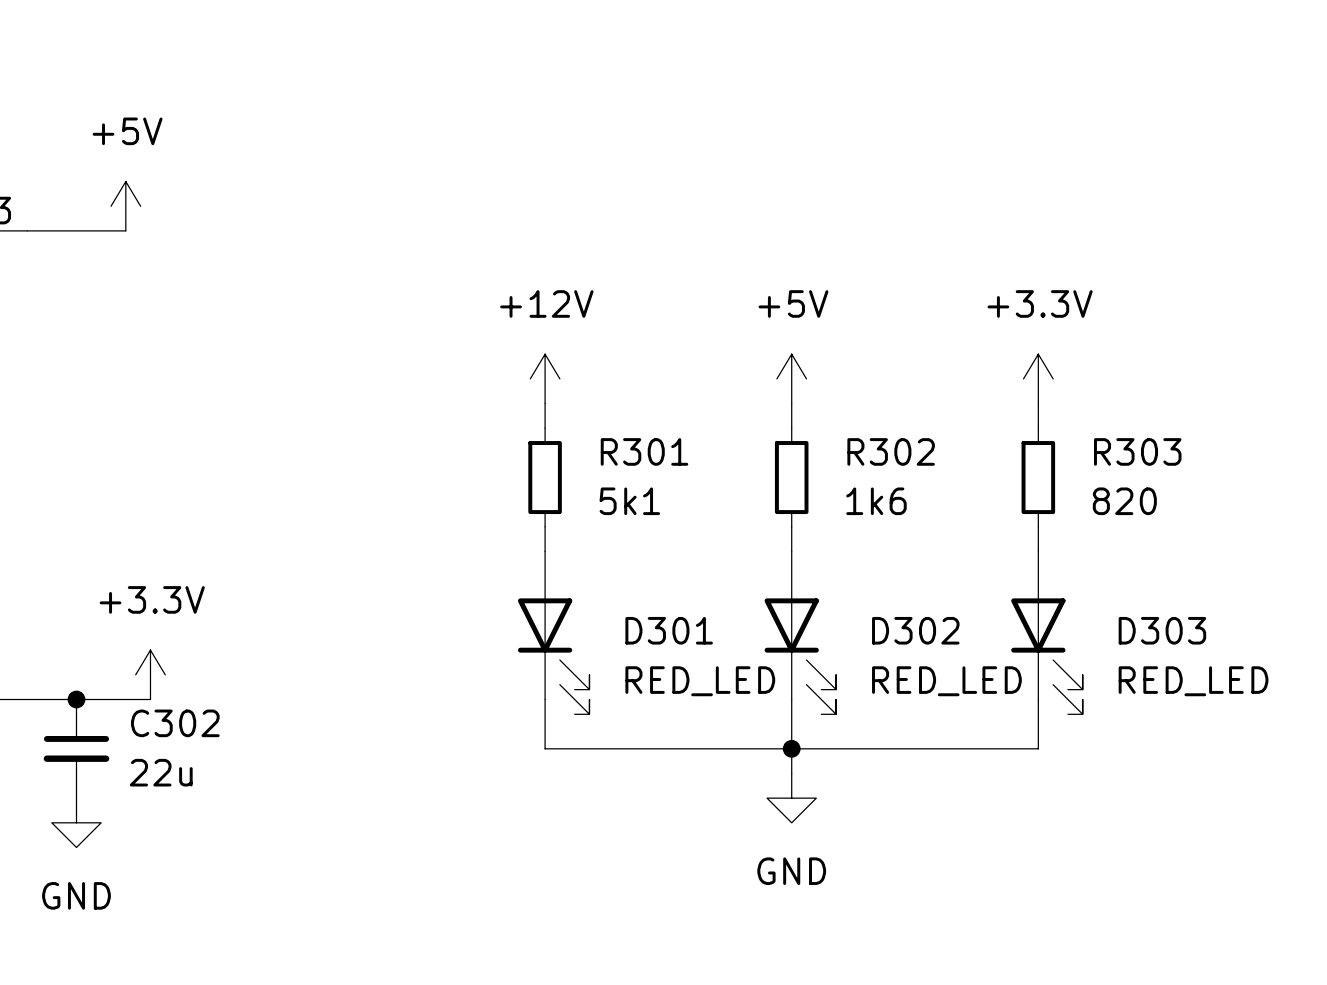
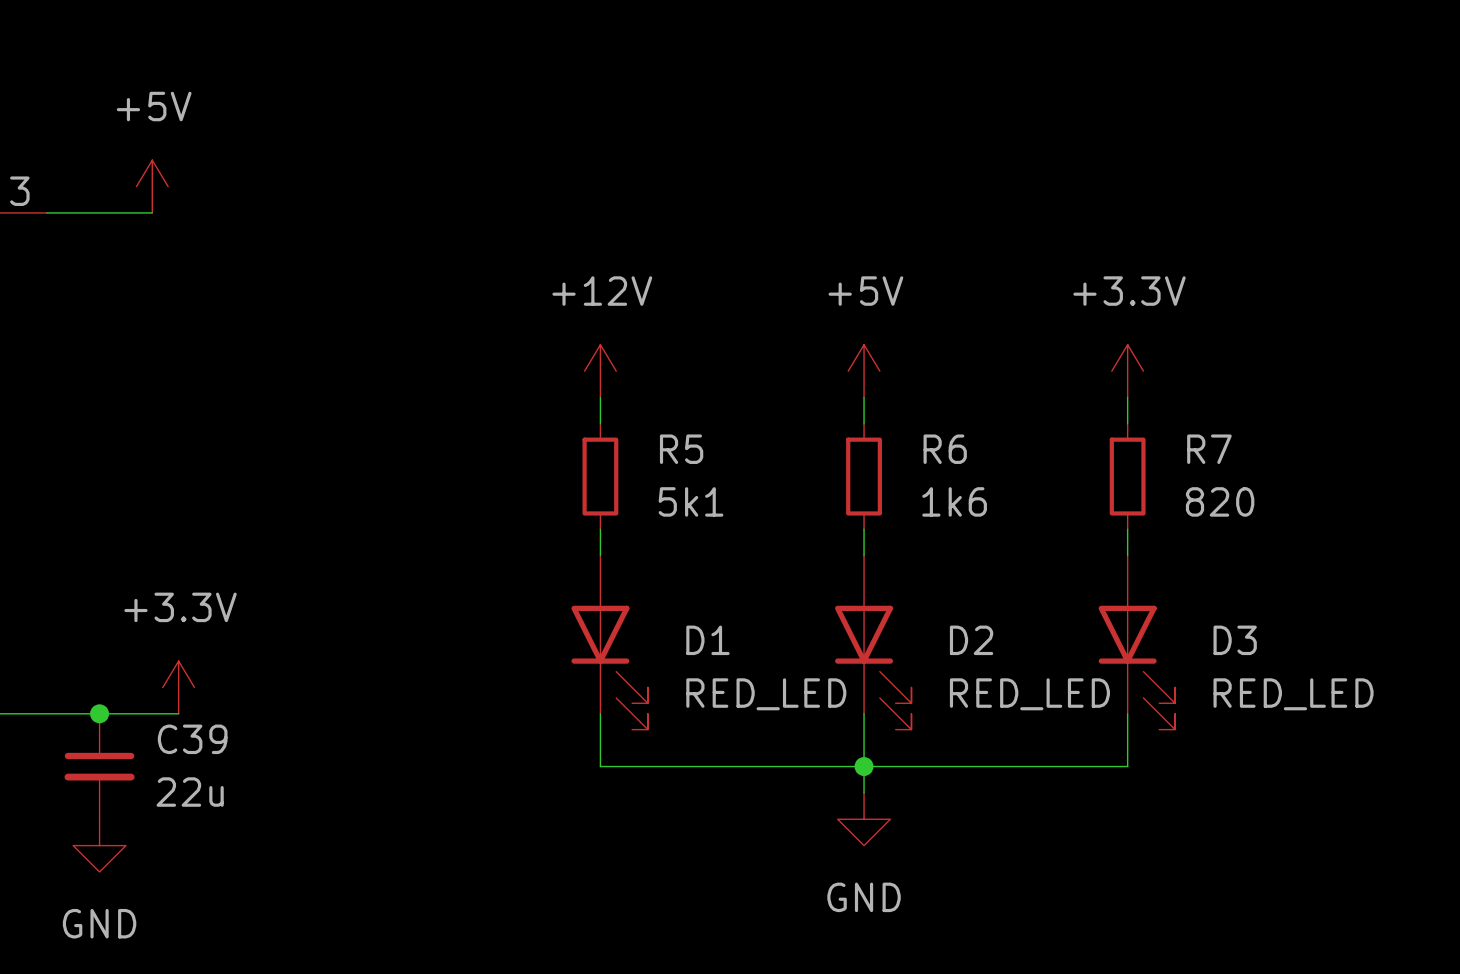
R301 name: R301 (644, 451) -> R5 (681, 449)
R302 name: R302 (891, 451) -> R6 (945, 449)
R303 name: R303 (1137, 451) -> R7 (1209, 449)
D301 name: D301 (669, 630) -> D1 (707, 640)
D302 name: D302 (915, 630) -> D2 (971, 640)
D303 name: D303 (1162, 630) -> D3 (1235, 640)
C302 name: C302 (175, 723) -> C39 (192, 739)

